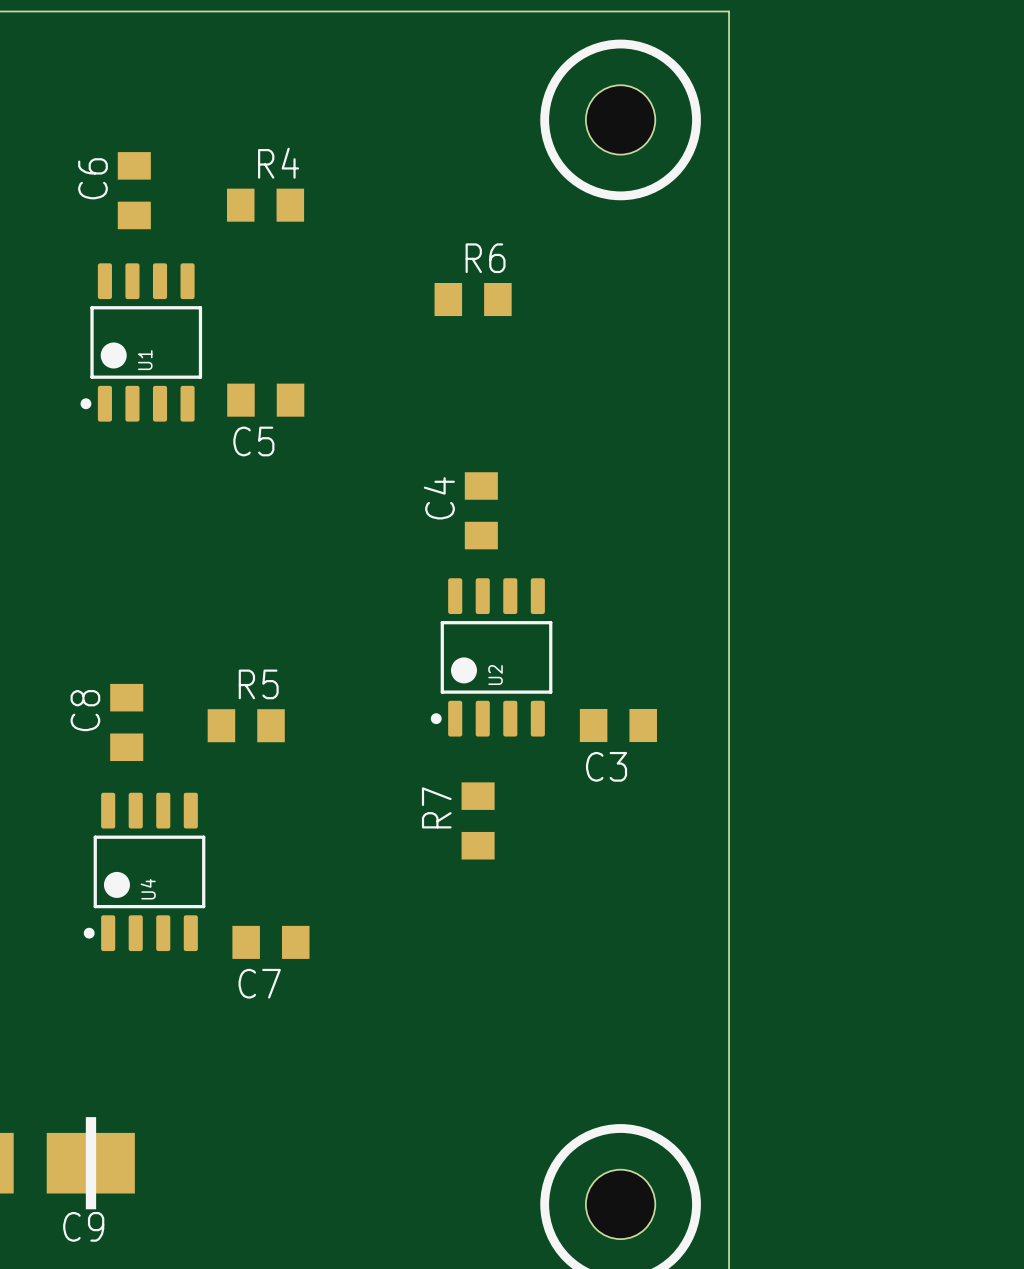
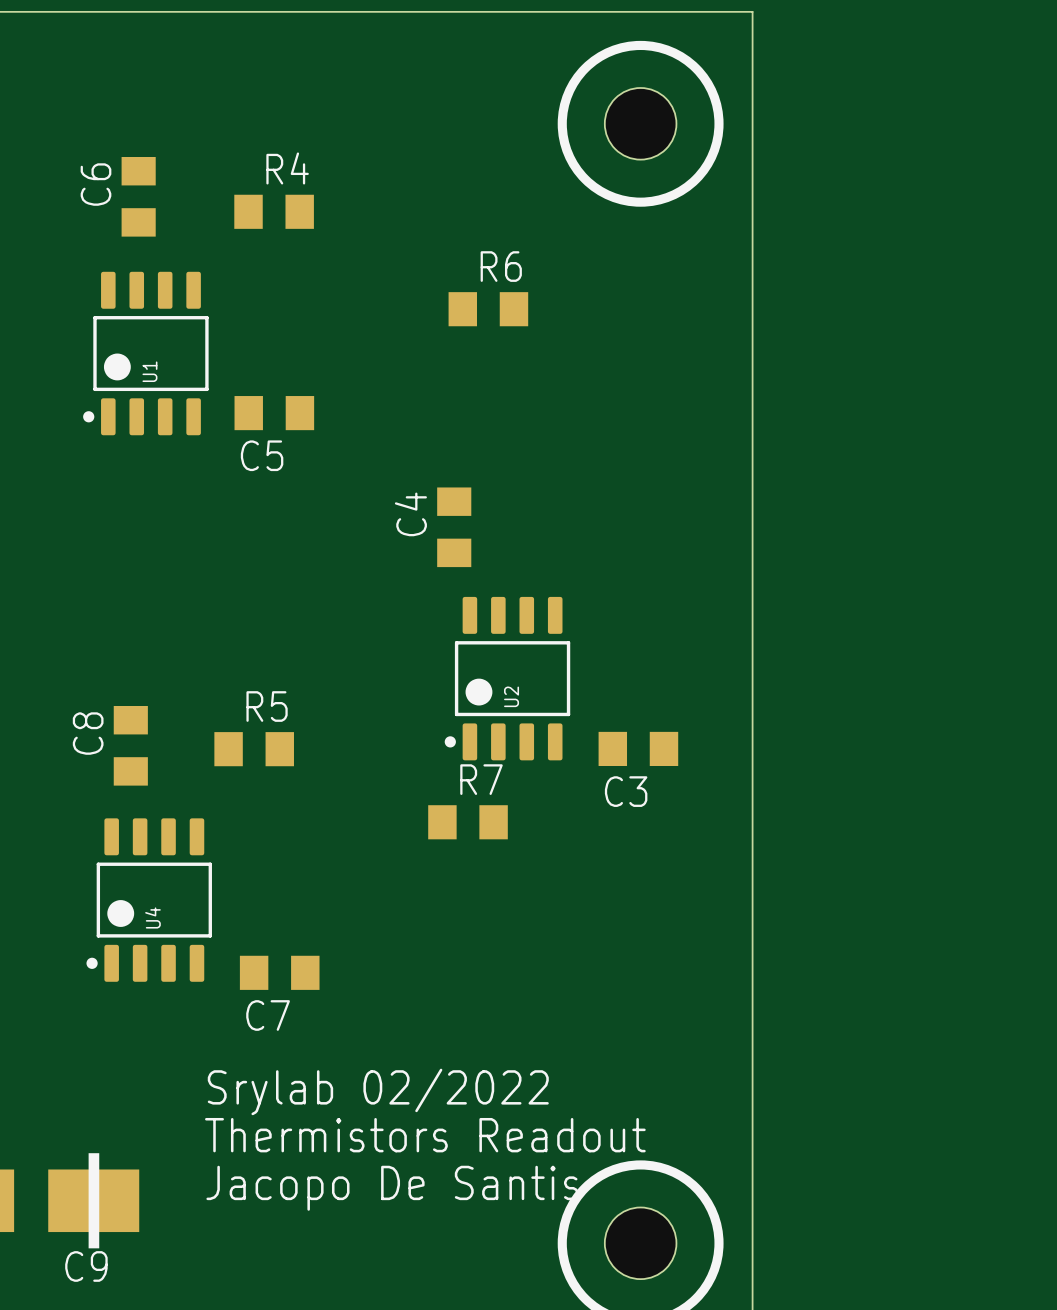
C4 position: (481, 510) -> (454, 527)
R7 rotation: 0° (478, 820) -> 90° clockwise (468, 822)
text: none -> Srylab 02/2022 (378, 1091)
text: none -> Thermistors Readout (425, 1135)
text: none -> Jacopo De Santis (392, 1188)

